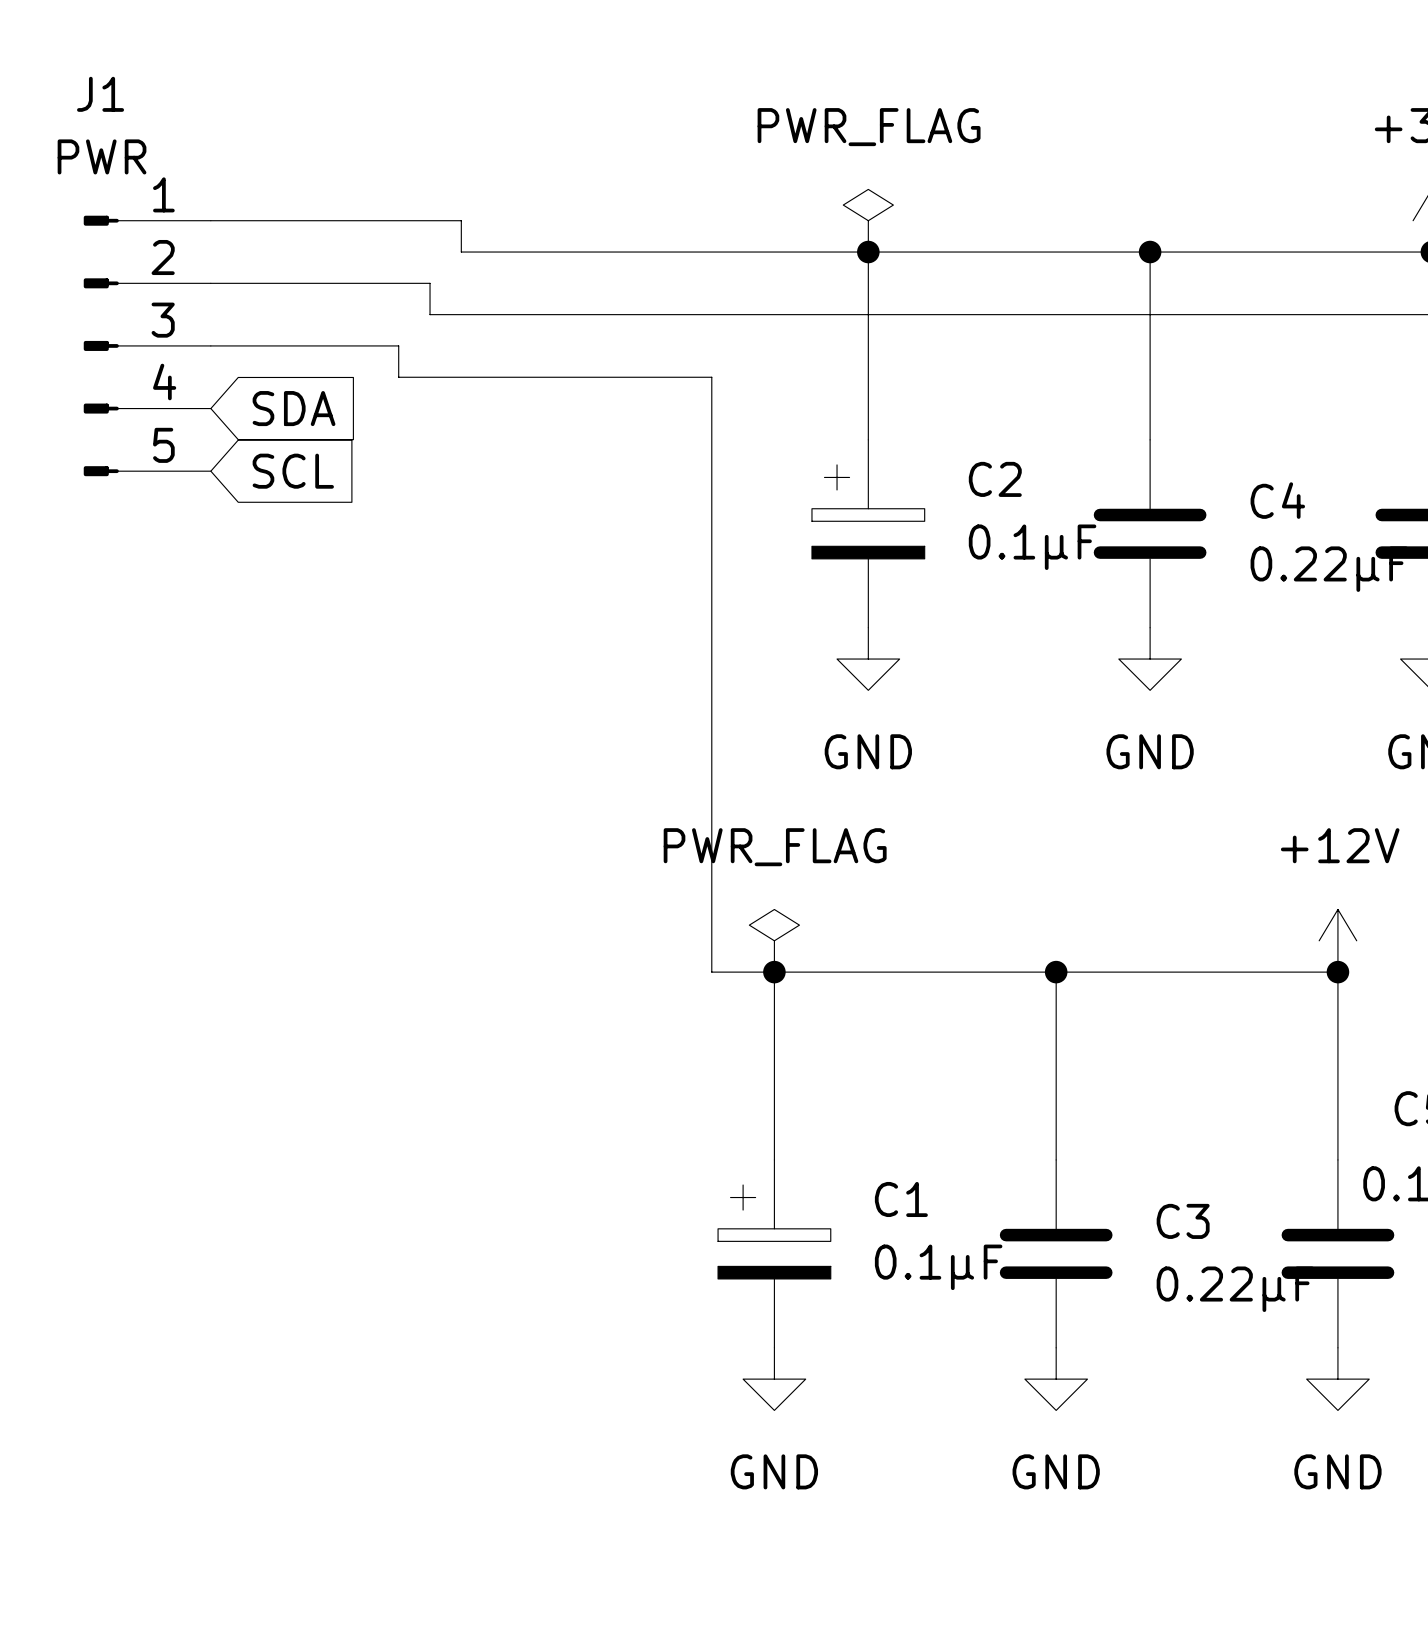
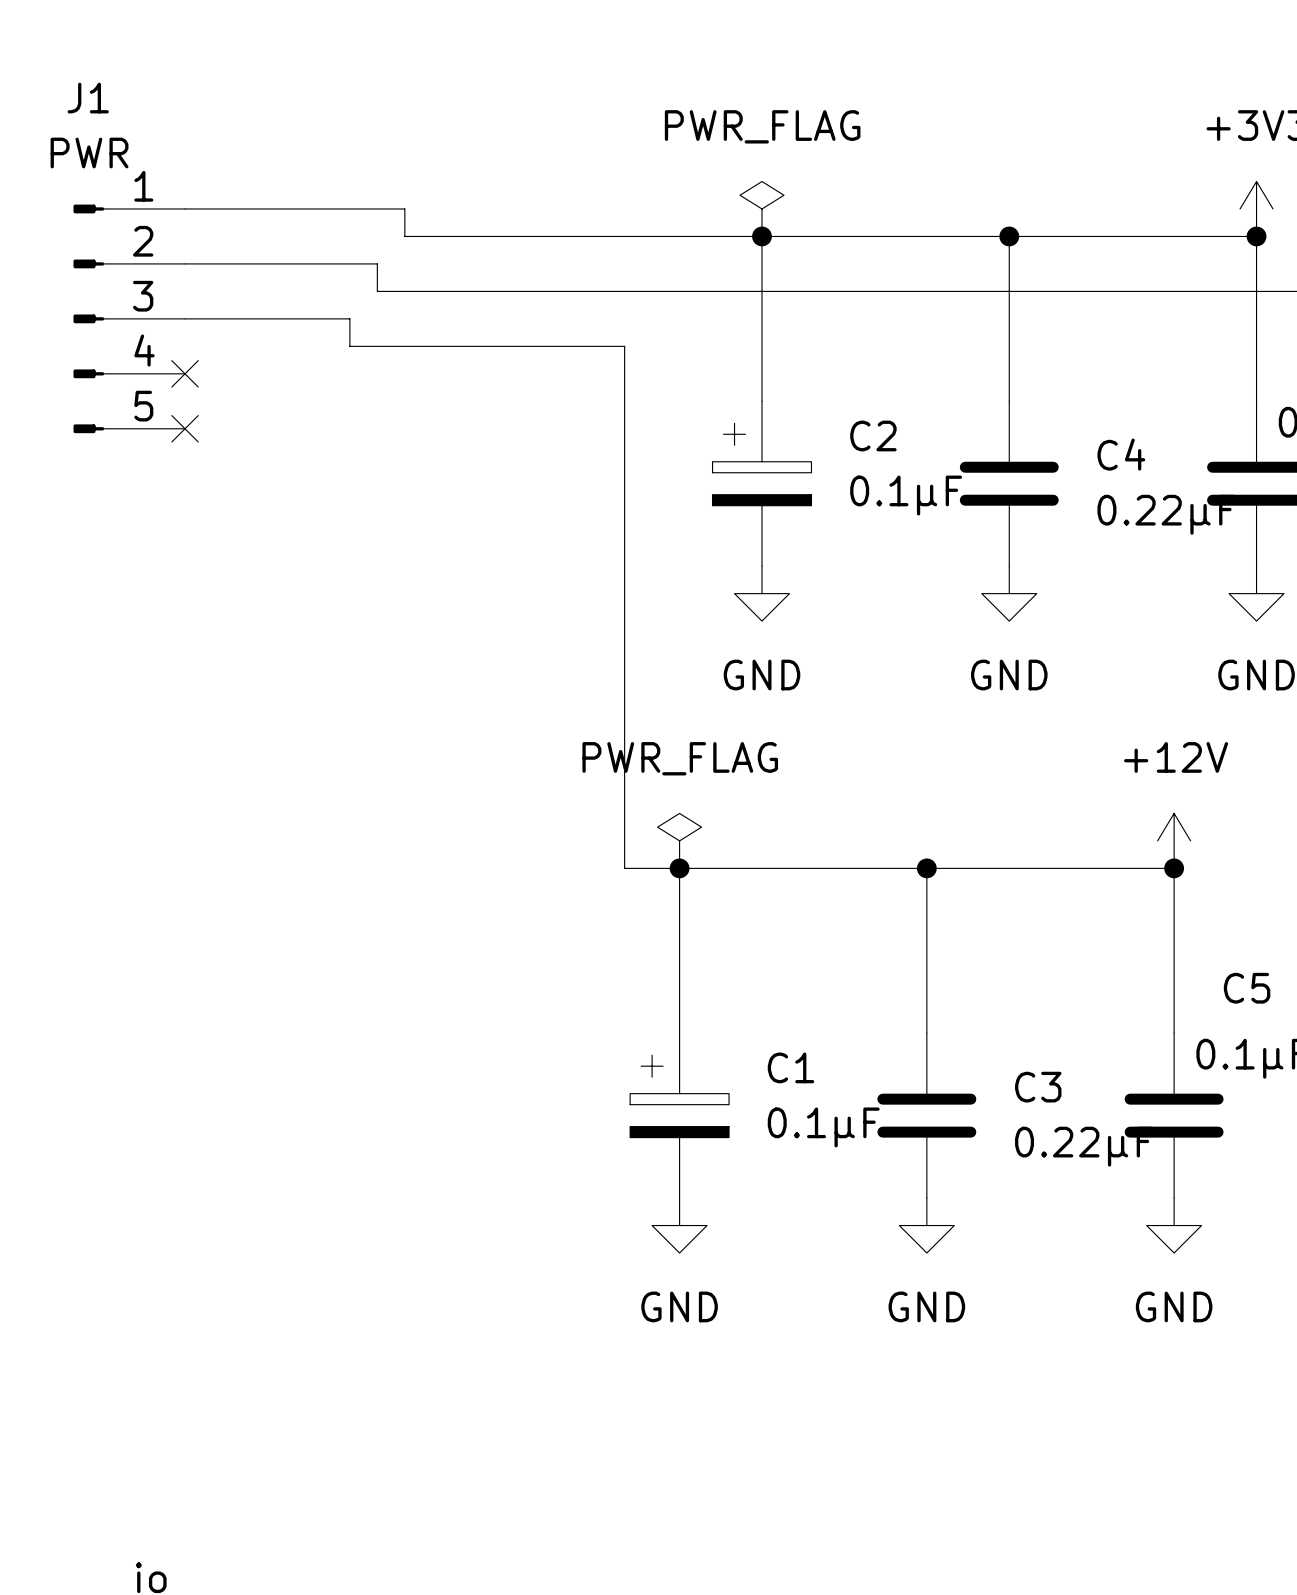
no-connect mark: none -> (185, 373)
global label: SDA (294, 408) -> none
no-connect mark: none -> (185, 428)
global label: SCL (293, 471) -> none

